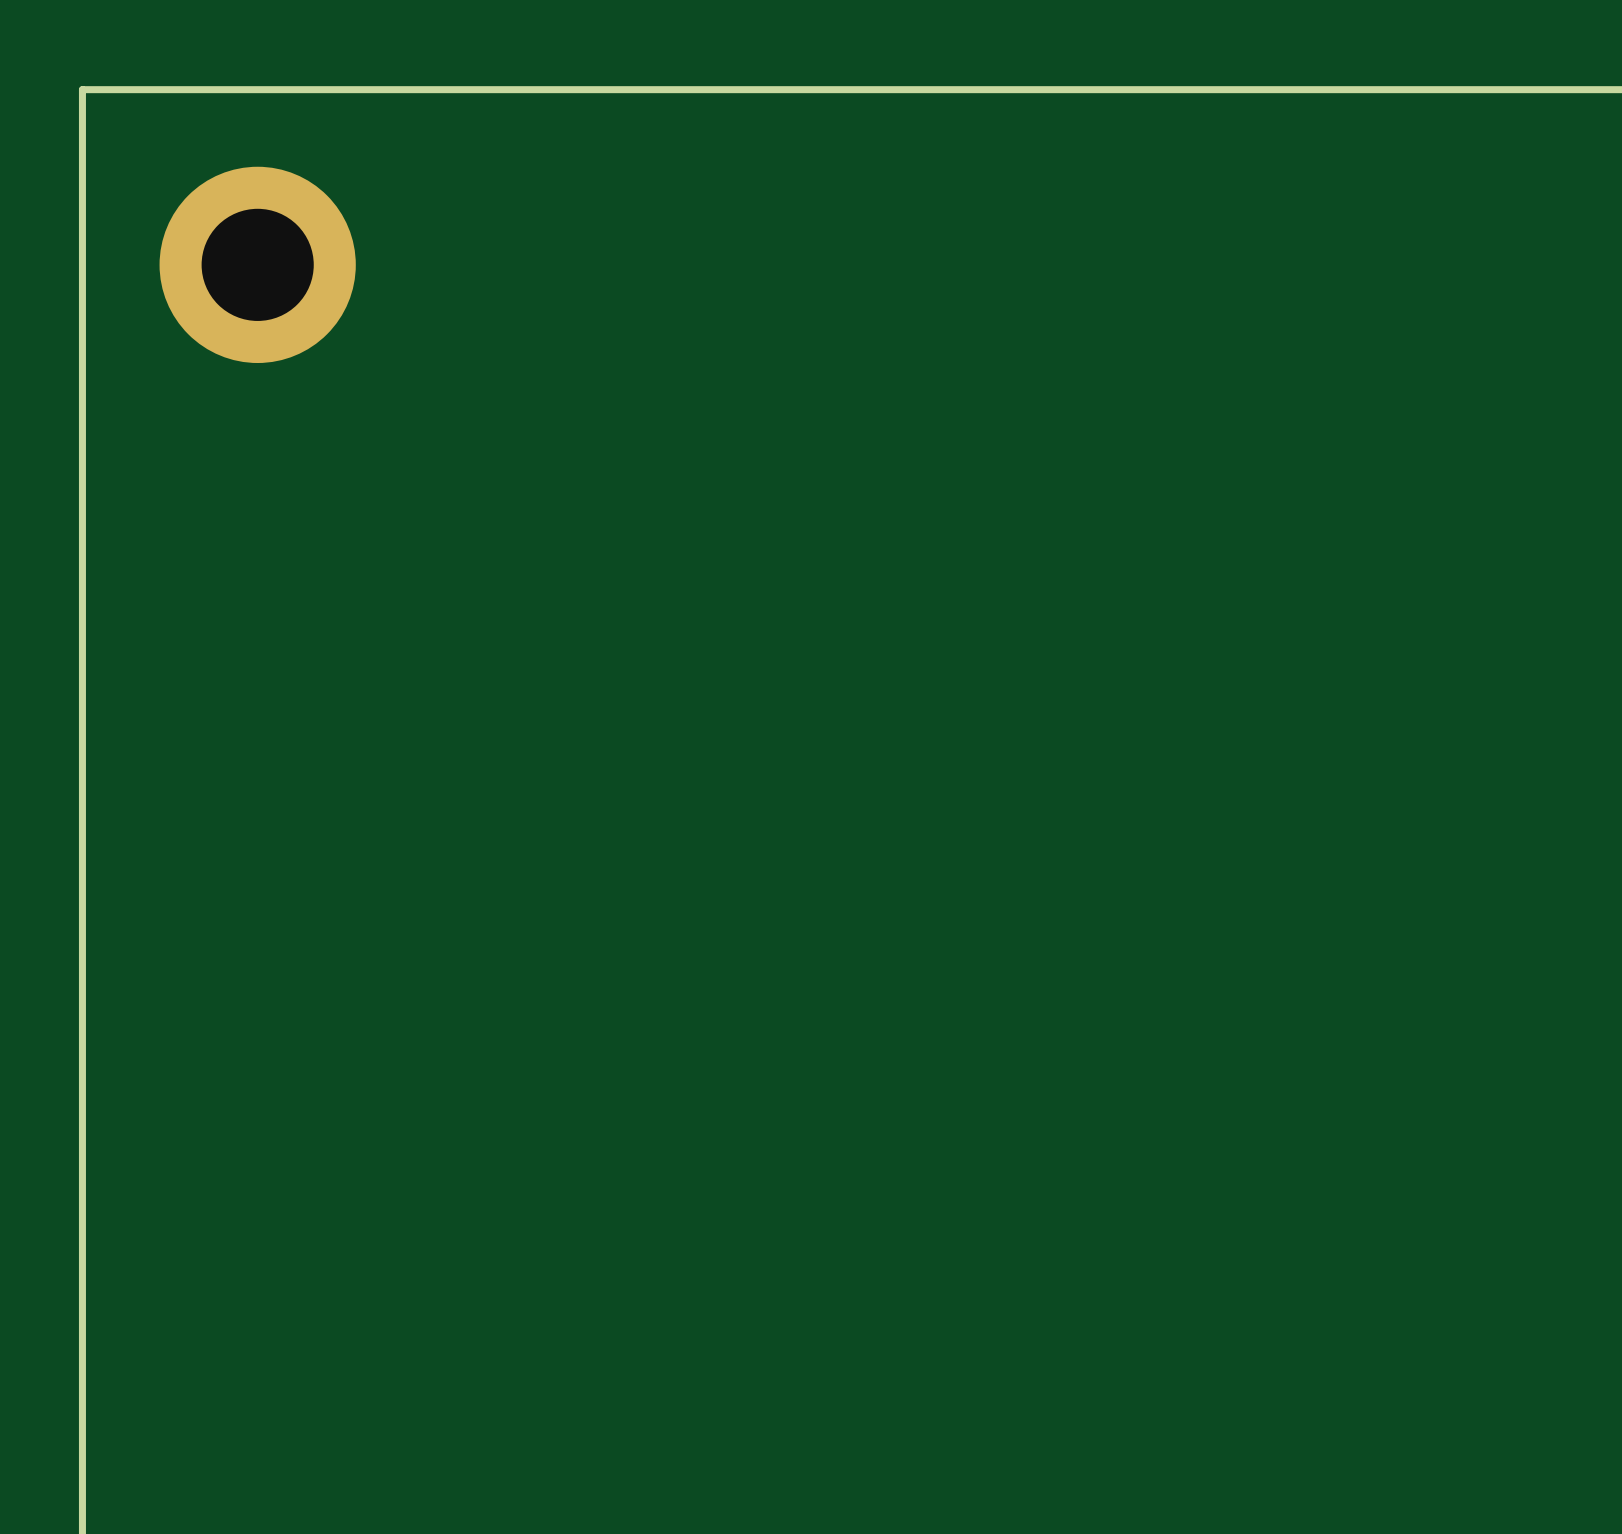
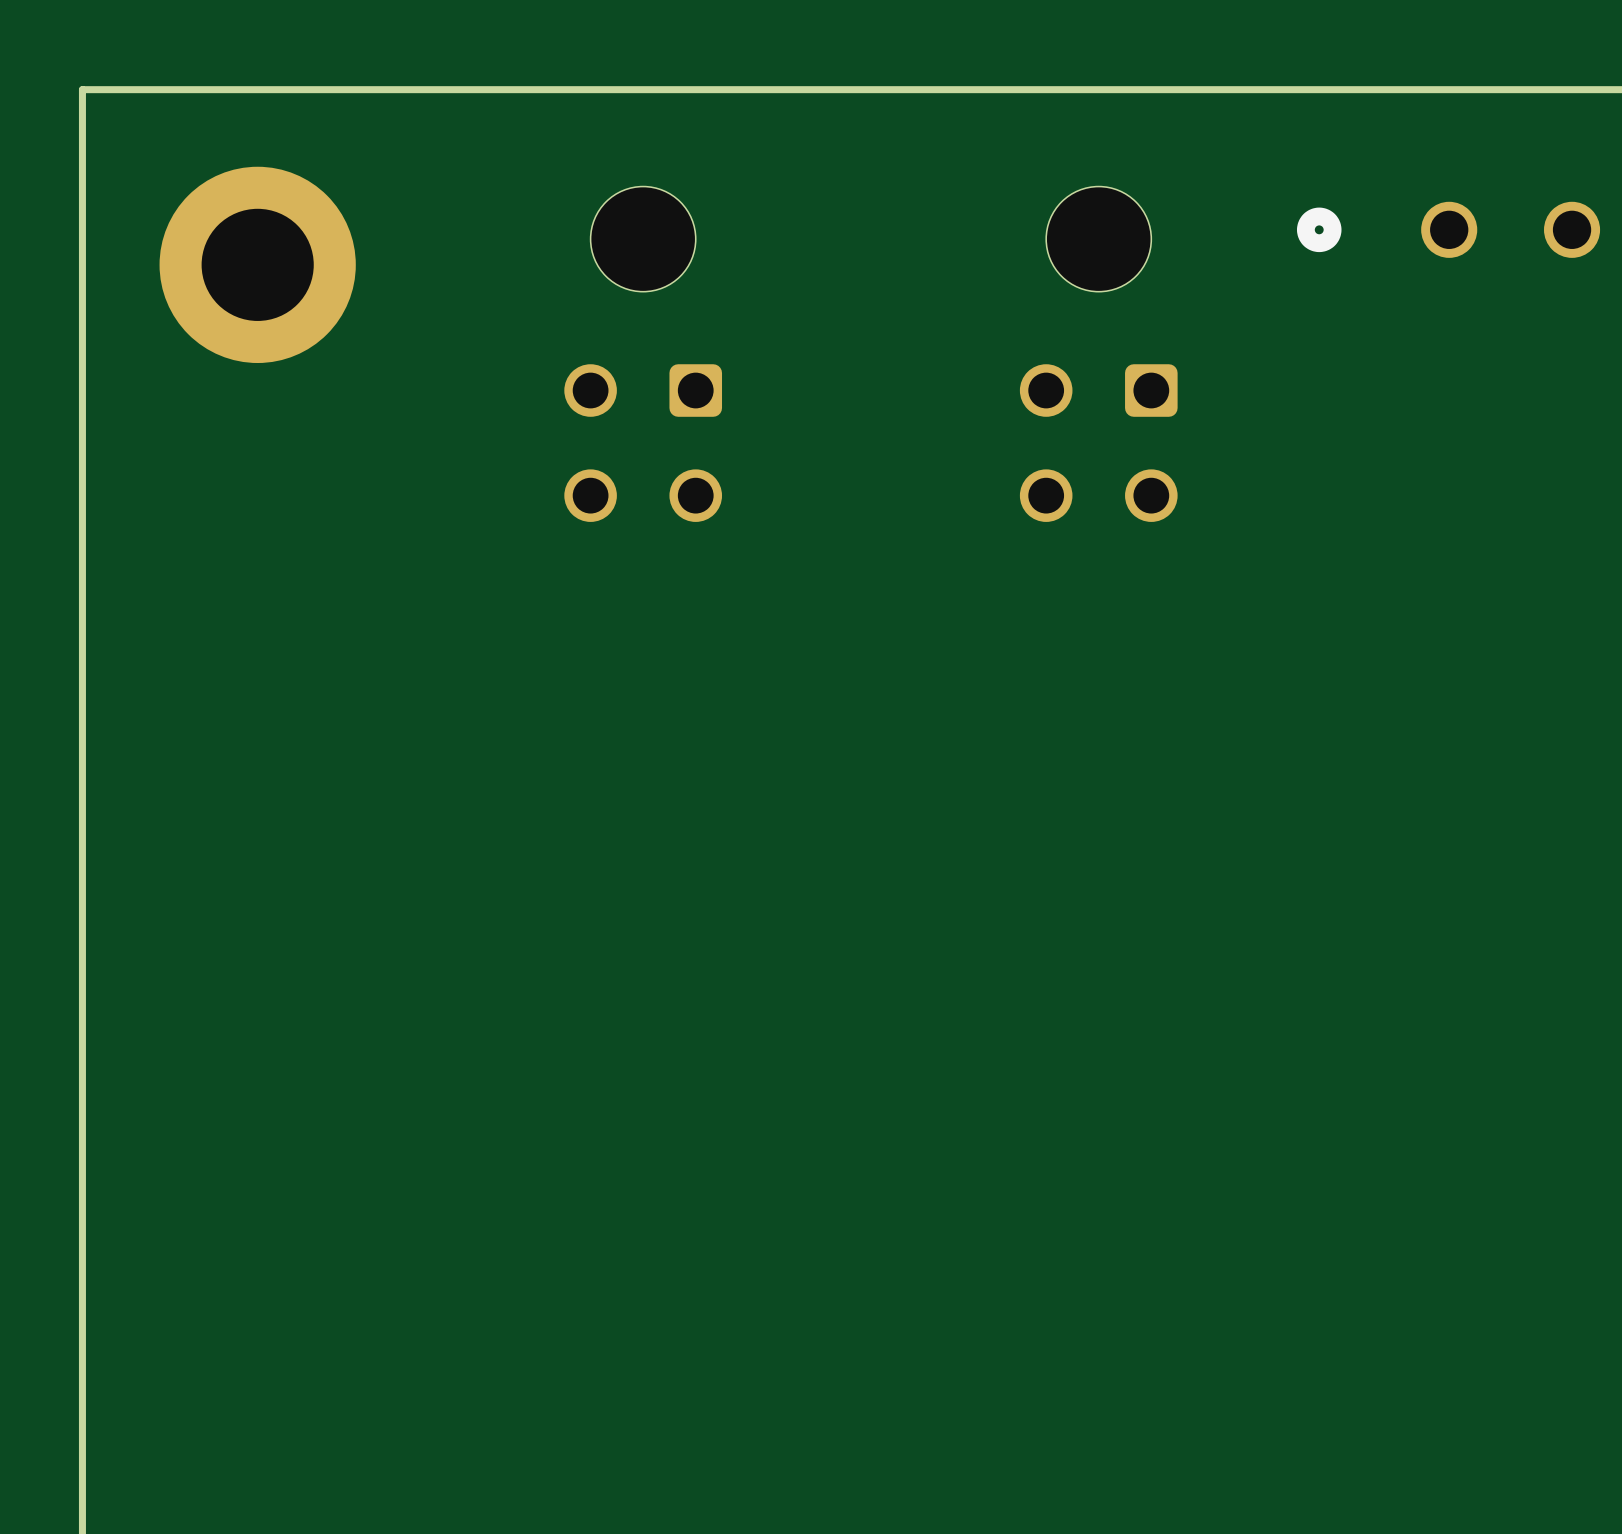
part: none -> (1448, 229)
part: none -> (643, 354)
part: none -> (1098, 354)

